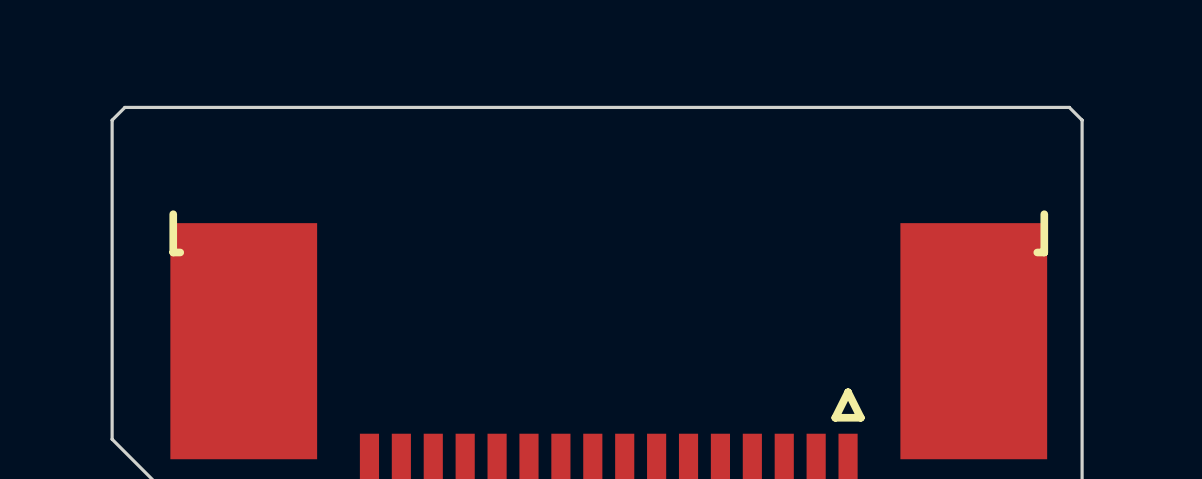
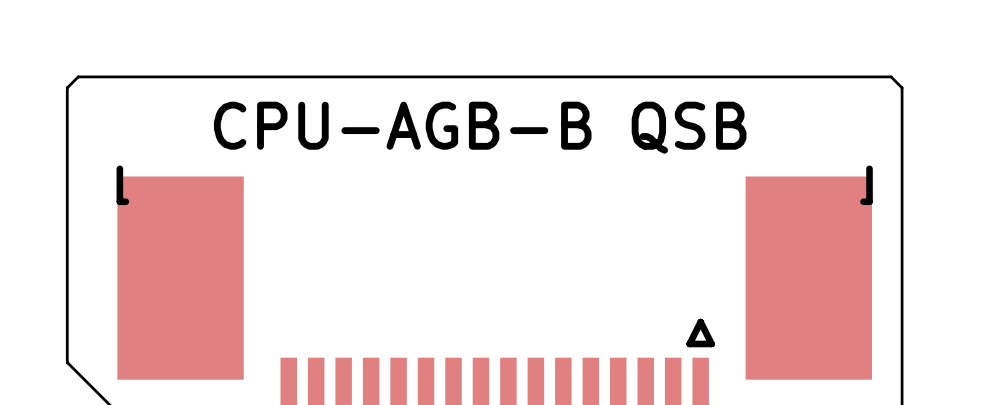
text: none -> CPU-AGB-B QSB (480, 127)

